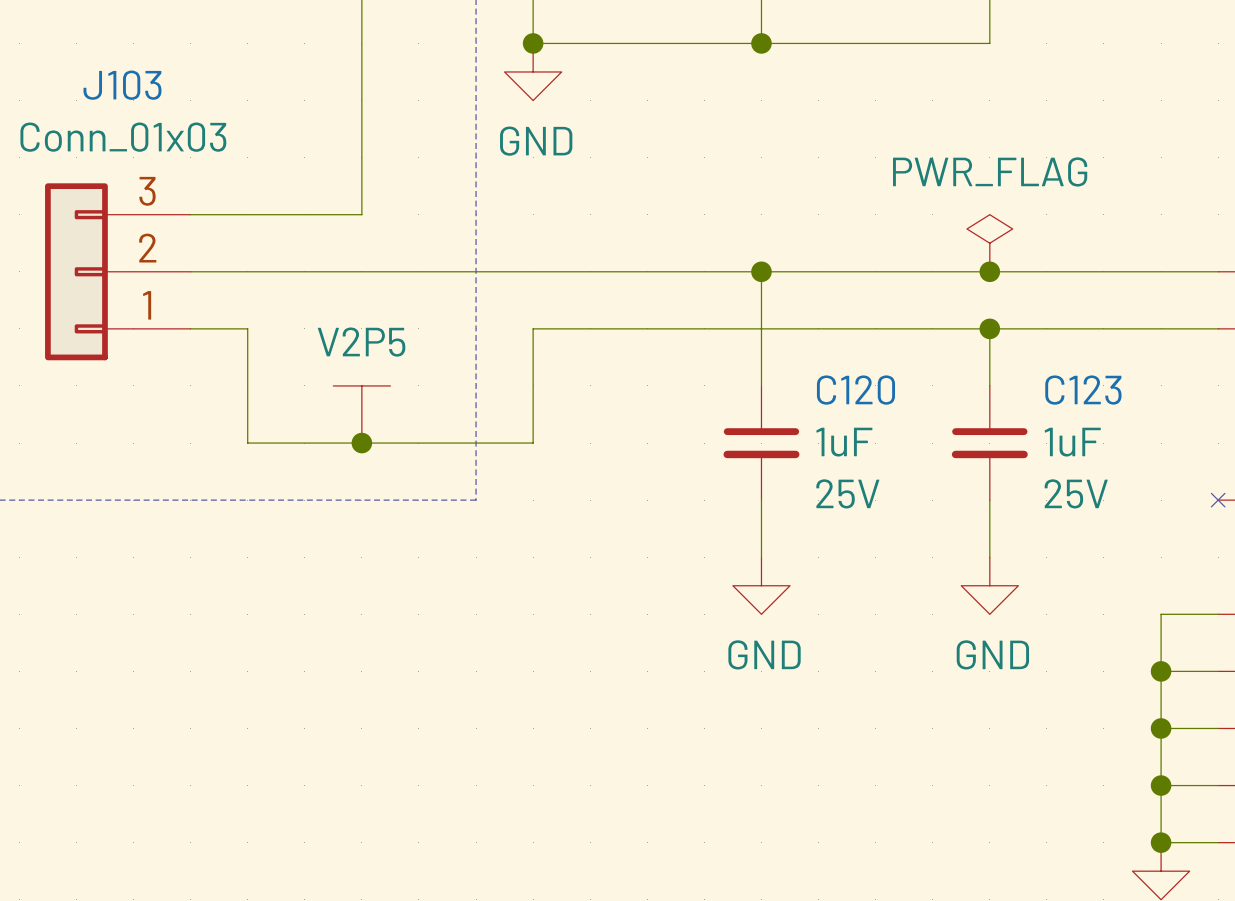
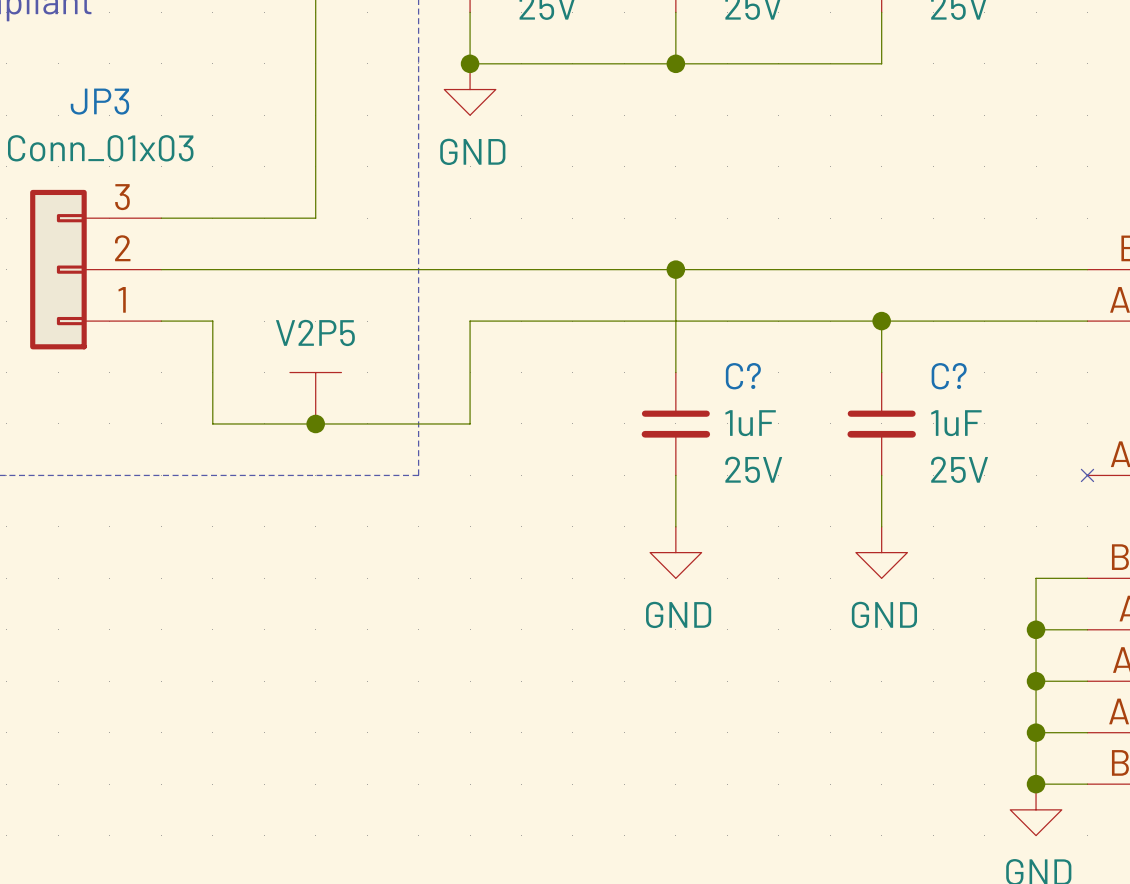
J103 name: J103 (122, 85) -> JP3 (99, 101)
power symbol: PWR_FLAG (989, 243) -> none
junction: (989, 271) -> none
C120 name: C120 (855, 390) -> C? (743, 376)
C123 name: C123 (1083, 390) -> C? (949, 376)

